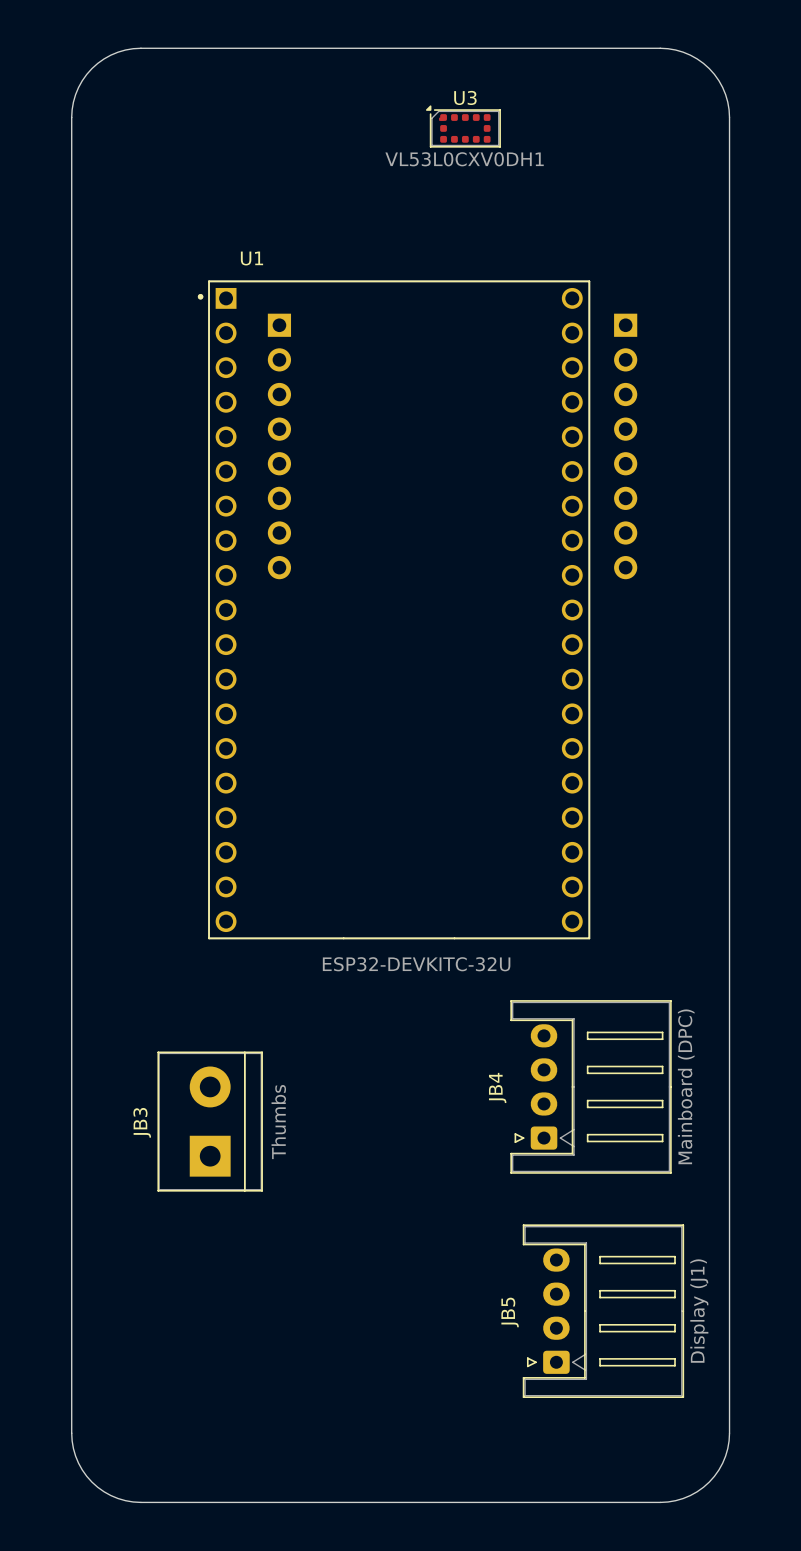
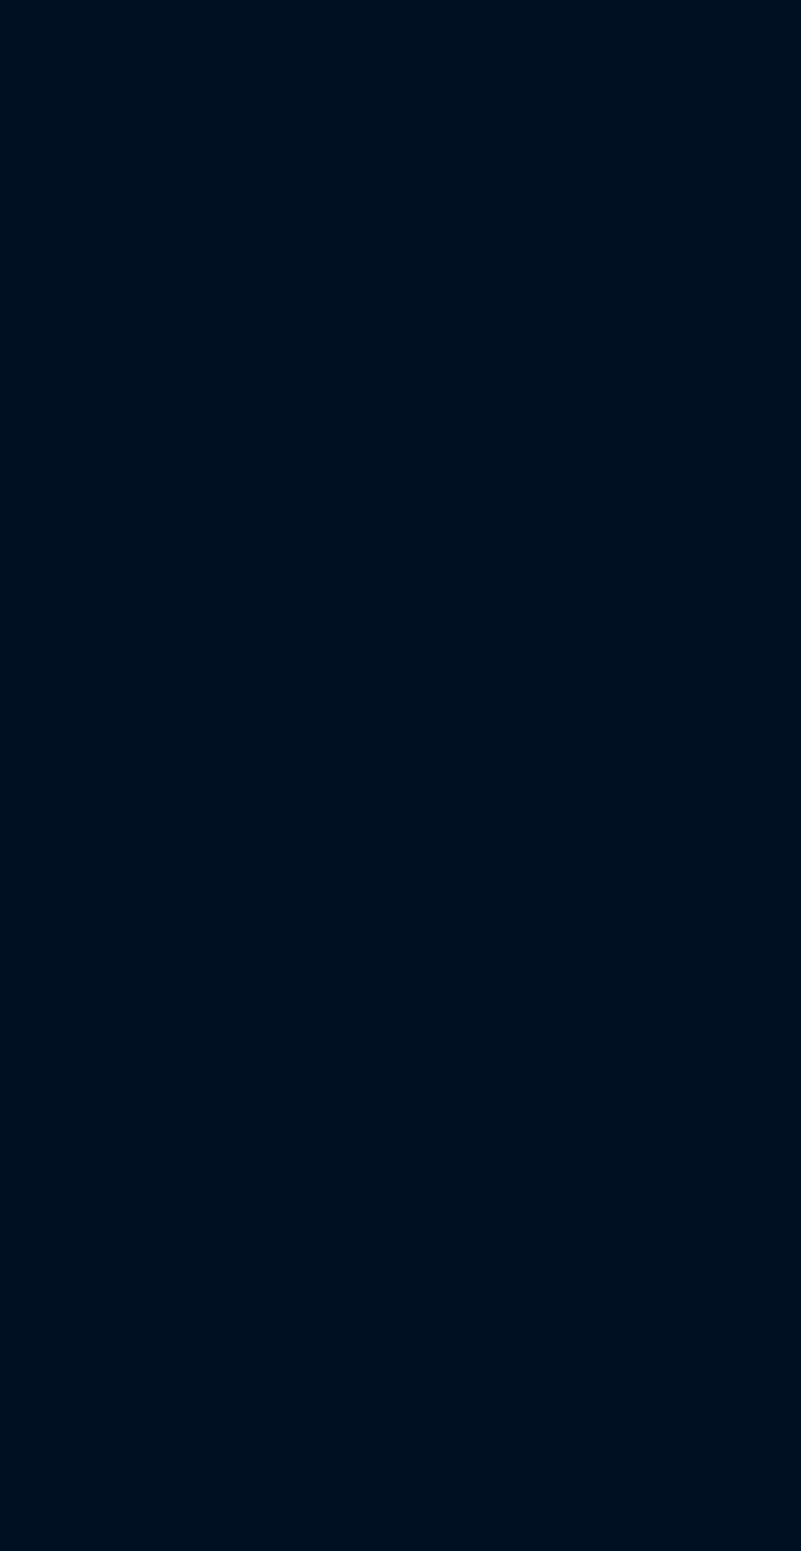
board edge: (140, 48) (668, 48) (690, 55) (703, 63) (714, 74) (725, 94) (729, 117) (729, 1433) (725, 1456) (714, 1476) (697, 1491) (683, 1498) (660, 1502) (133, 1501) (110, 1495) (97, 1487) (82, 1470) (75, 1456) (71, 1433) (71, 117) (73, 102) (78, 87) (91, 68) (104, 58) (118, 52) (140, 48) -> none
U3: VL53L0CXV0DH1 (463, 126) -> none
part: (279, 446) -> none
part: (625, 446) -> none
U1: ESP32-DEVKITC-32U (394, 609) -> none
JB4: Mainboard (DPC) (591, 1086) -> none
JB3: Thumbs (210, 1121) -> none
JB5: Display (J1) (603, 1311) -> none

